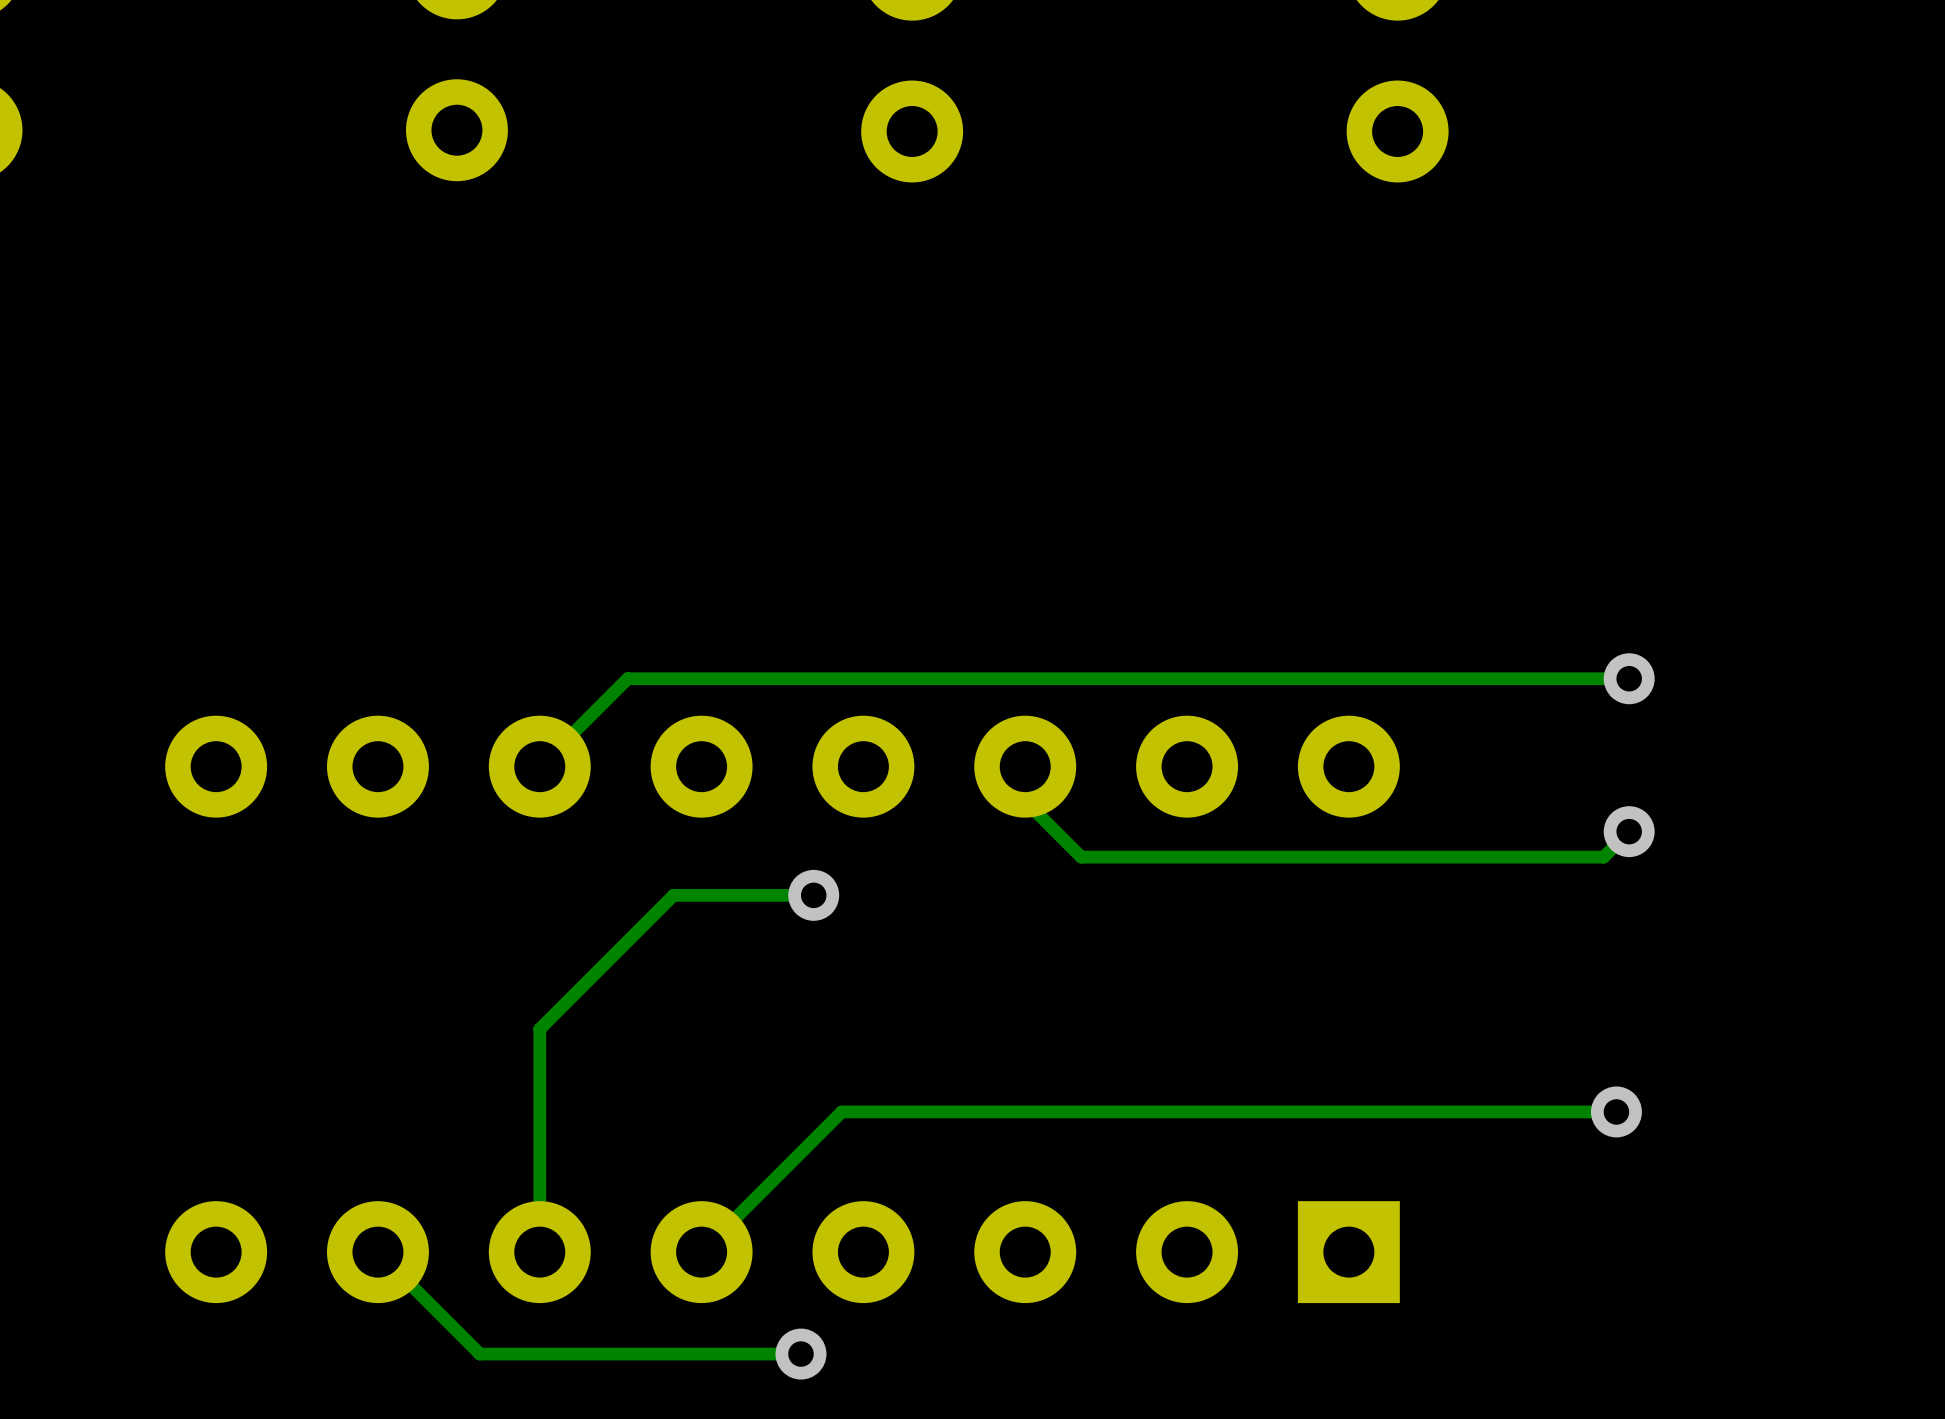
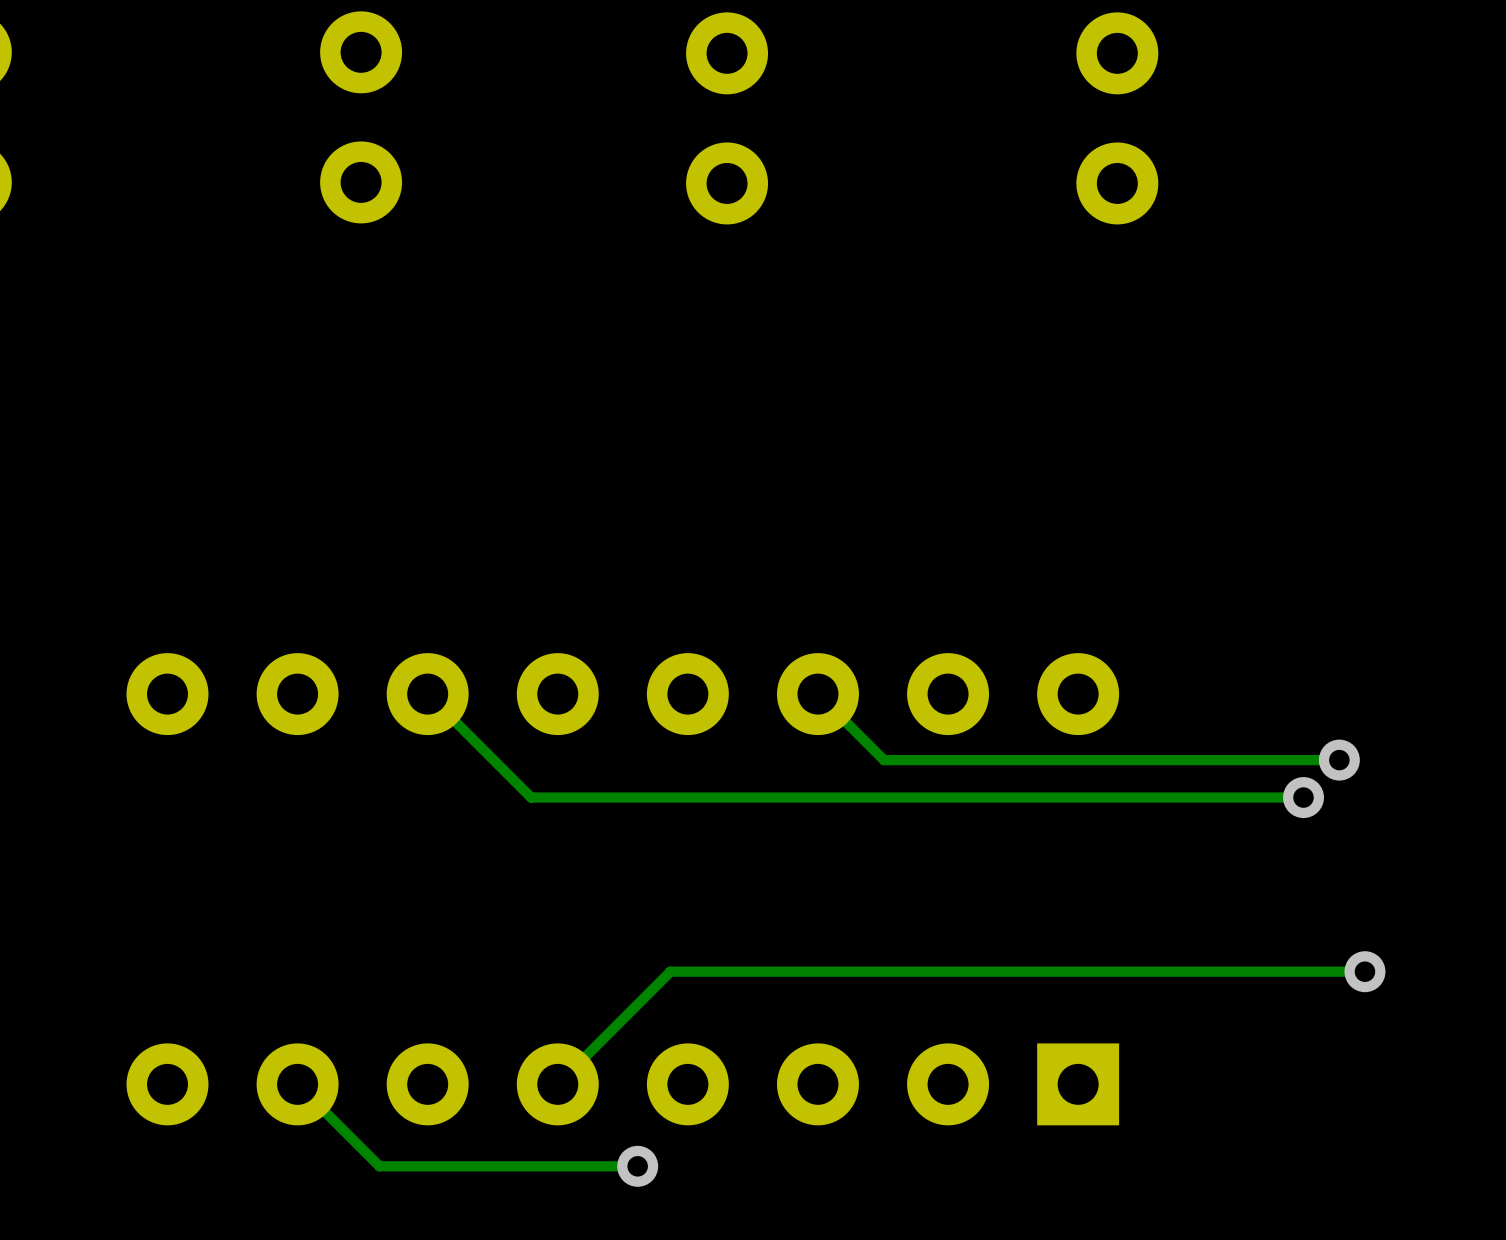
track: (1629, 678) (627, 678) (539, 766) -> none
via: (1629, 678) -> none
track: (1025, 766) (1025, 801) (1081, 857) (1603, 857) (1629, 831) -> (817, 694) (883, 760) (1339, 760)
via position: (1629, 831) -> (1339, 760)
track: (673, 895) (539, 1029) (539, 1252) -> (535, 797) (531, 797) (427, 694)
via: (813, 895) -> none
track: none -> (1303, 797) (647, 797)
via: none -> (1303, 797)
via position: (1616, 1111) -> (1364, 971)
track: none -> (1364, 971) (1293, 971)

